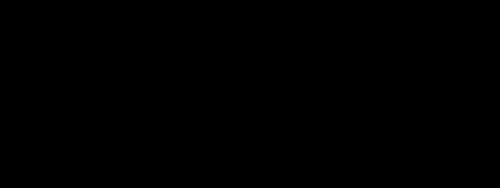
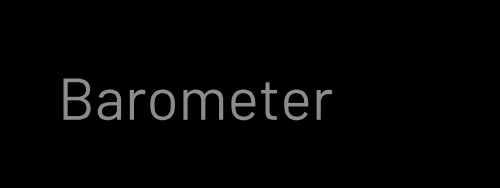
text: none -> Barometer (197, 99)

